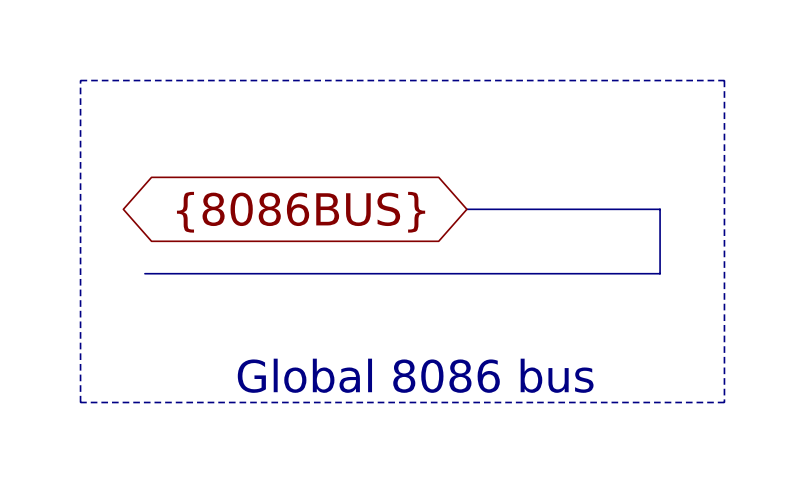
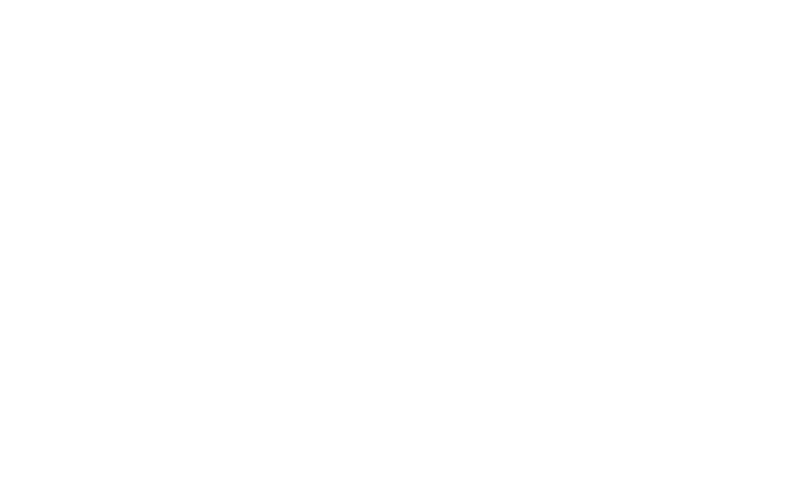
line: (80, 80) (724, 80) (724, 402) (80, 402) (80, 80) -> none
bus: (466, 209) (660, 209) (660, 273) (144, 273) -> none
global label: {8086BUS} (301, 212) -> none
text: Global 8086 bus (415, 375) -> none

